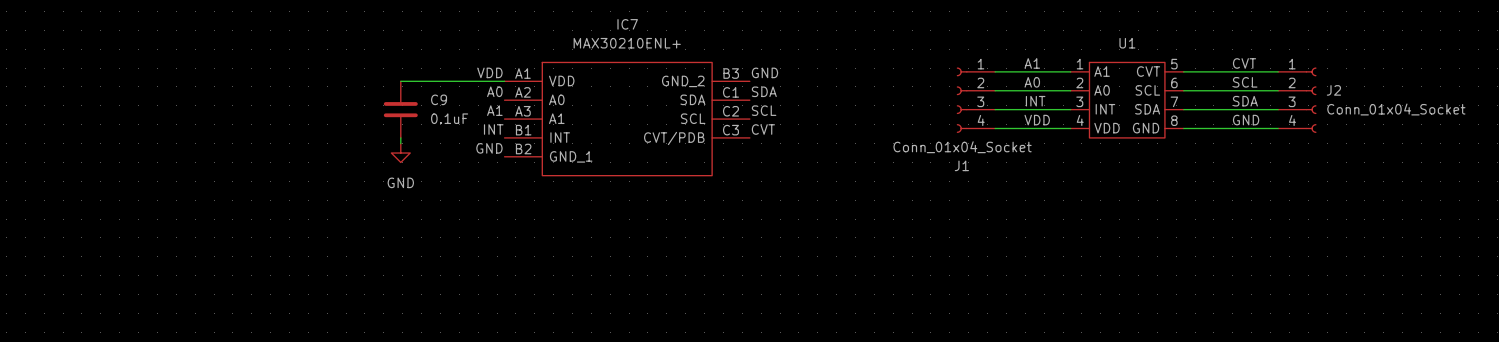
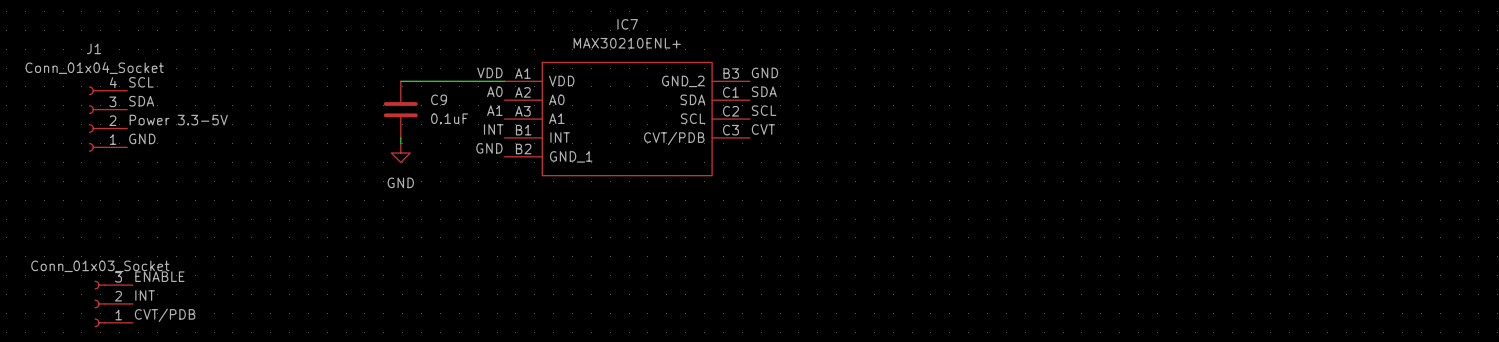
label: A1 (1032, 63) -> none
label: CVT (1244, 63) -> none
wire: (995, 71) (1070, 71) -> none
wire: (1183, 71) (1278, 71) -> none
label: none -> SCL (141, 82)
label: A0 (1032, 82) -> none
label: SCL (1245, 82) -> none
wire: (995, 90) (1070, 90) -> none
wire: (1183, 90) (1278, 90) -> none
J1 flip: as is (962, 100) -> up-down (94, 119)
J1 position: (975, 100) -> (108, 119)
U1: (1127, 100) -> none
J2: Conn_01x04_Socket (1297, 100) -> none
label: none -> SDA (141, 101)
label: INT (1035, 101) -> none
label: SDA (1245, 101) -> none
wire: (995, 109) (1070, 109) -> none
wire: (1183, 109) (1278, 109) -> none
label: none -> Power 3.3-5V (178, 120)
label: VDD (1037, 120) -> none
label: GND (1246, 120) -> none
wire: (995, 128) (1070, 128) -> none
wire: (1183, 128) (1278, 128) -> none
label: none -> GND (142, 138)
label: none -> ENABLE (159, 276)
label: none -> INT (145, 295)
part: none -> Conn_01x03_Socket (113, 303)
label: none -> CVT/PDB (165, 315)

